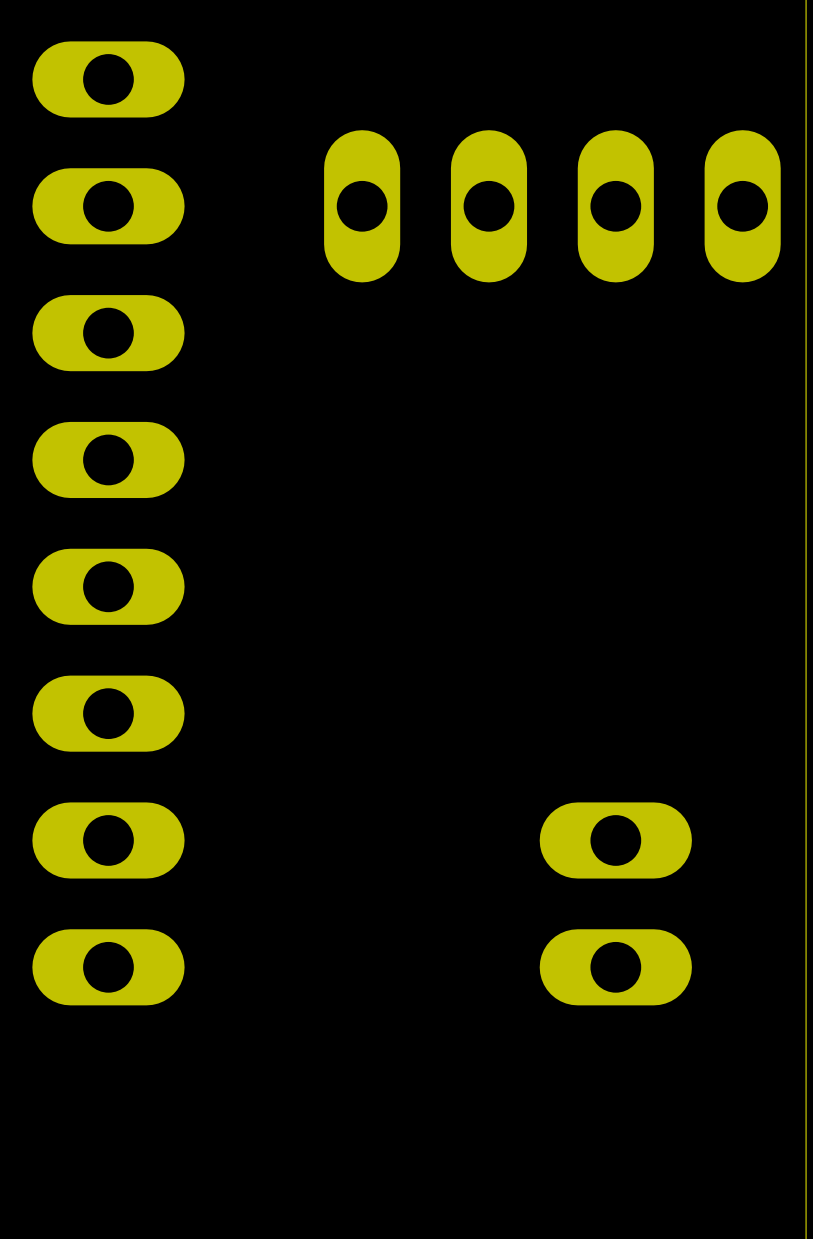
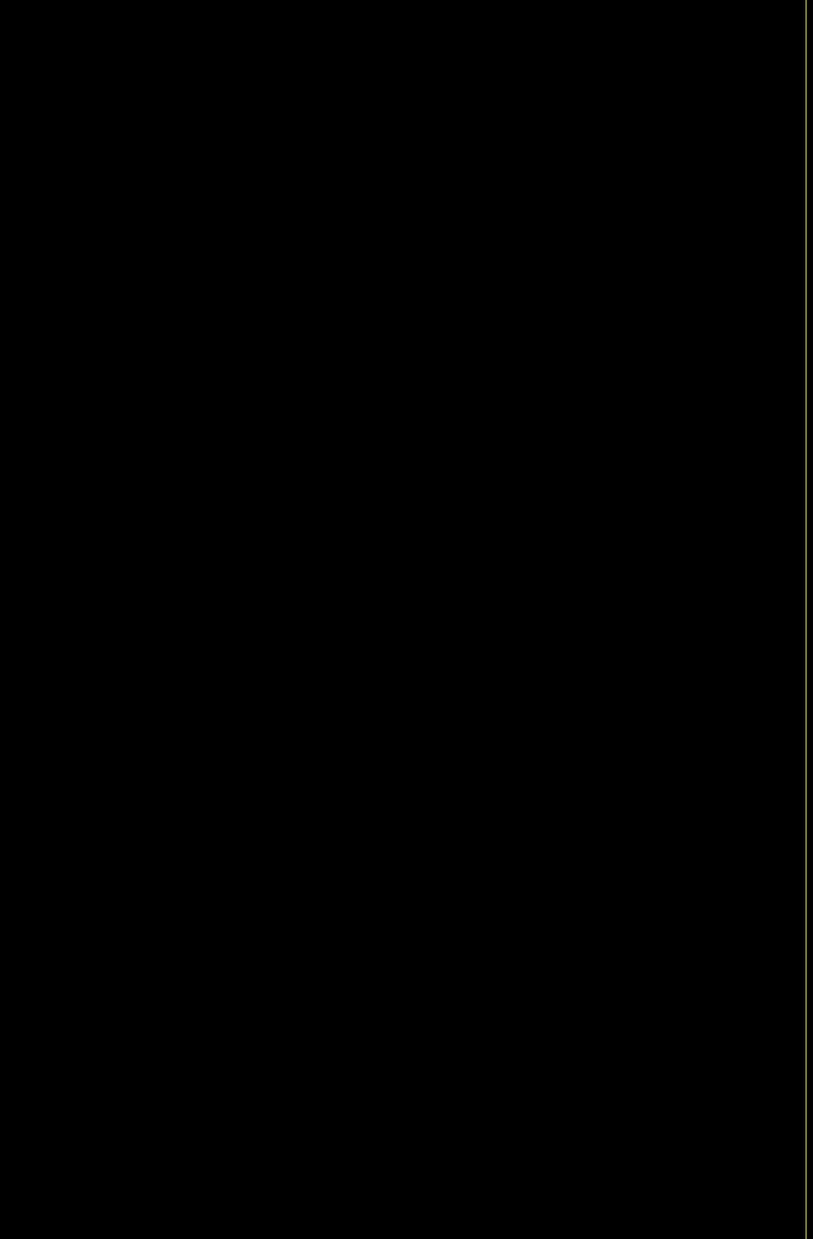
part: (552, 206) -> none
part: (108, 523) -> none
part: (615, 903) -> none

